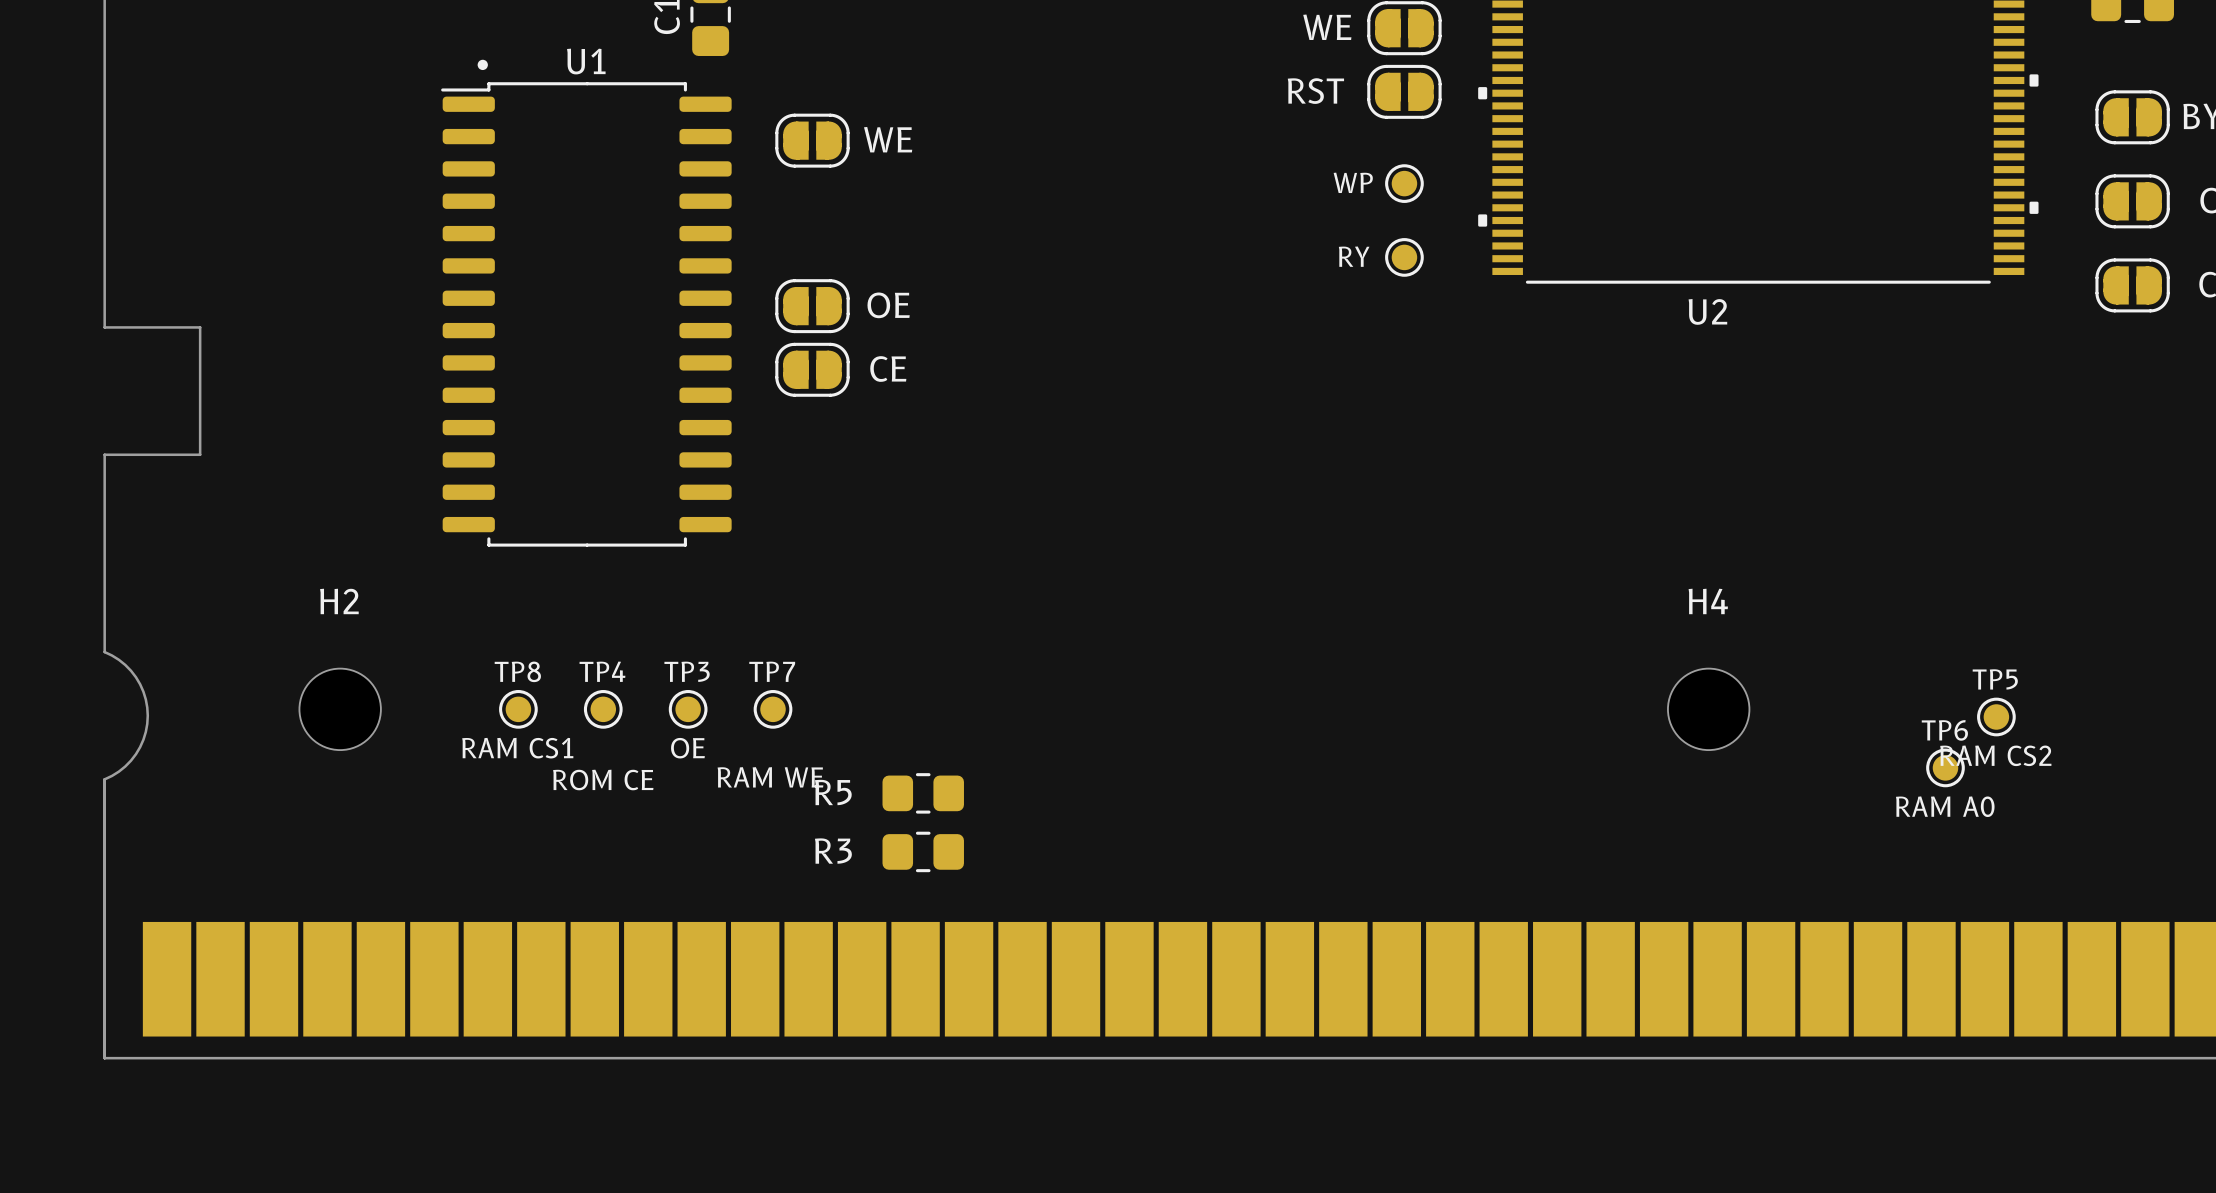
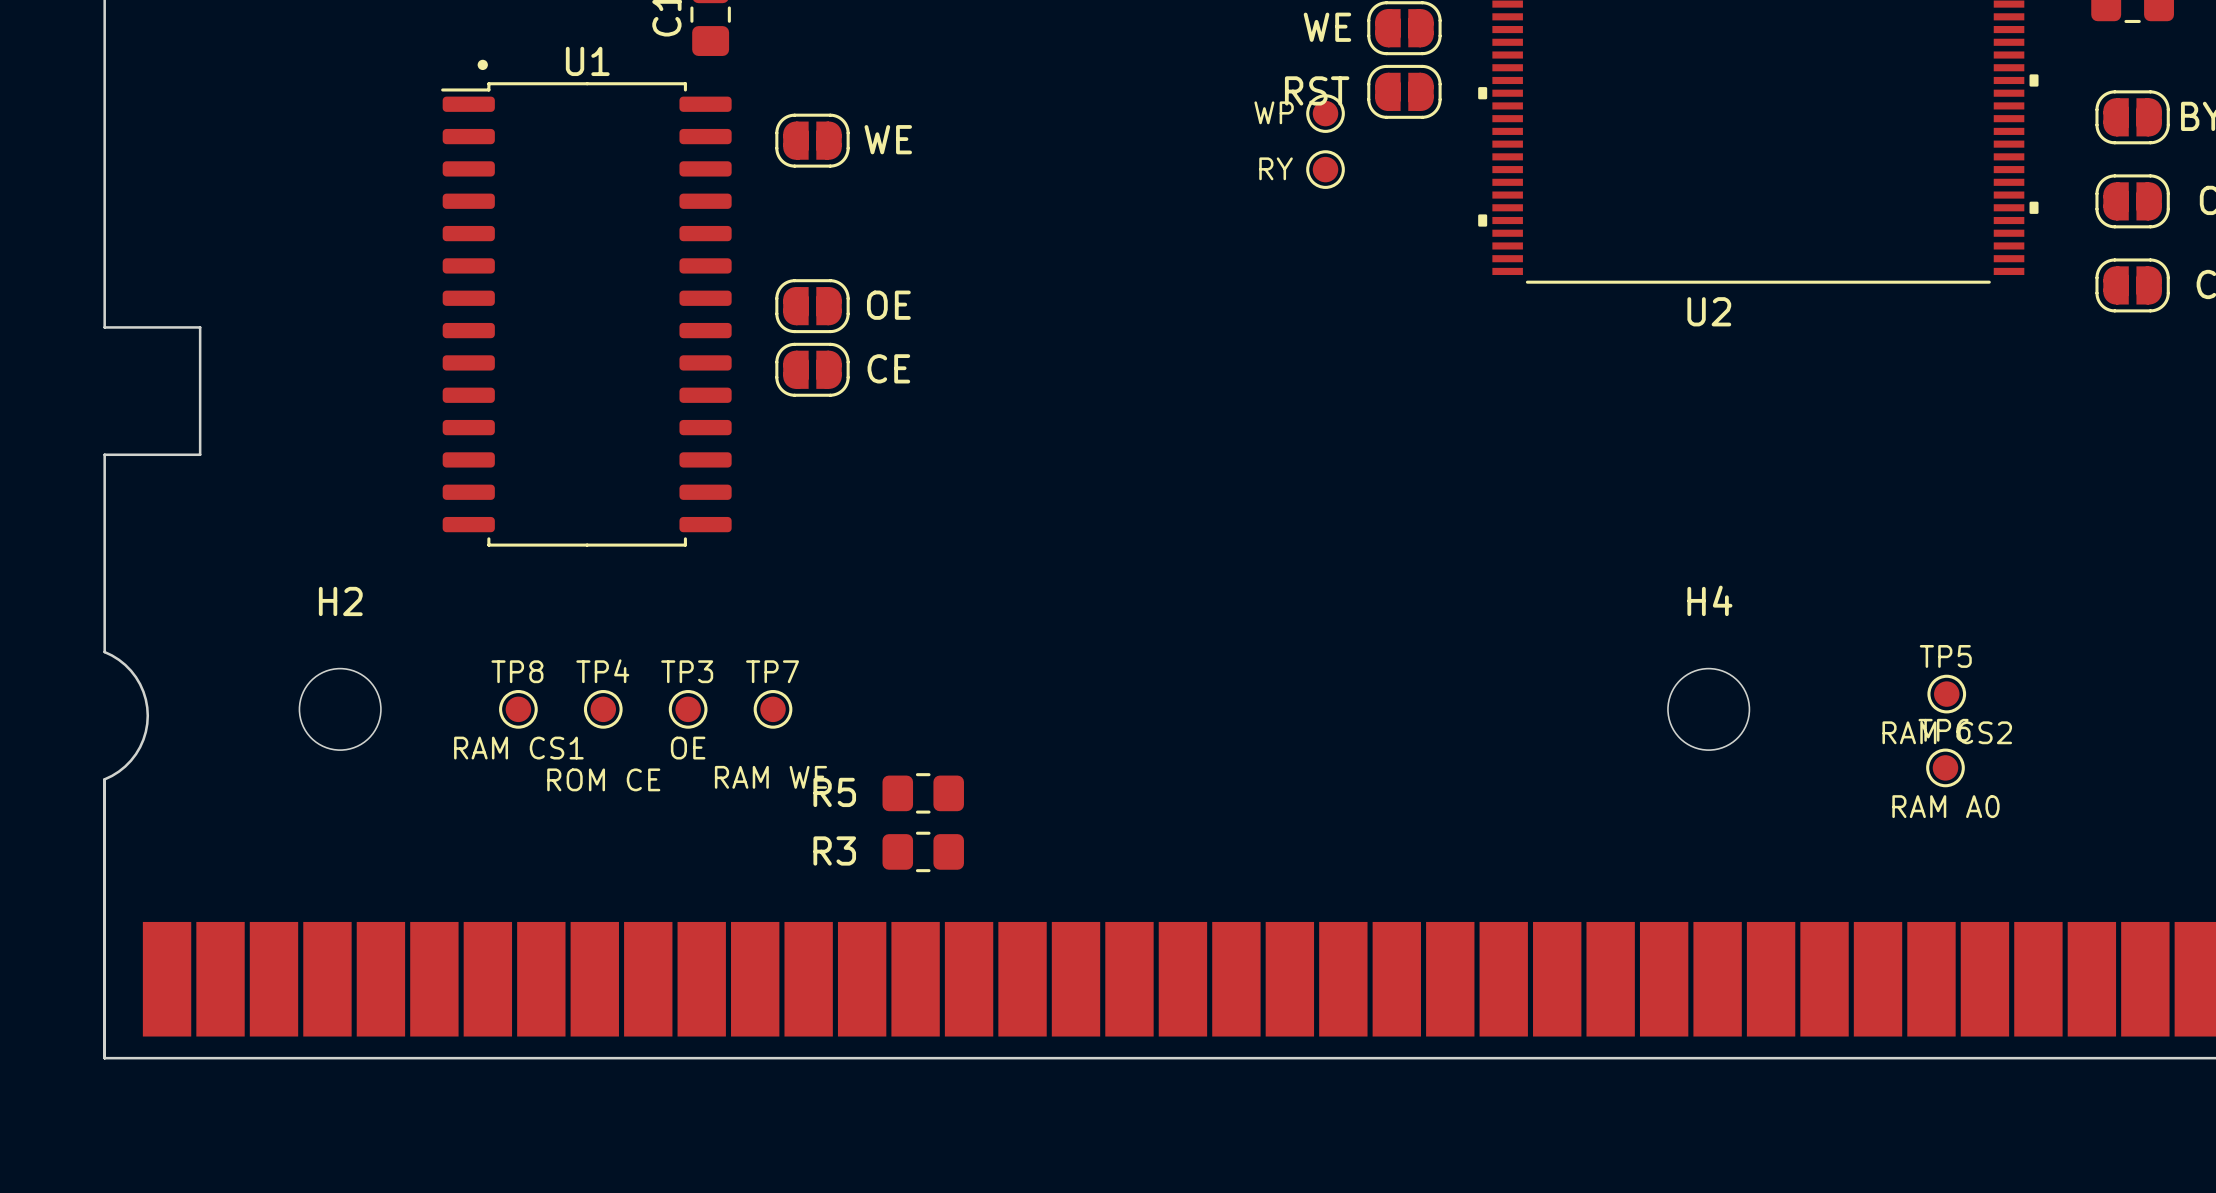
part position: (1404, 183) -> (1325, 113)
part position: (1404, 257) -> (1325, 169)
TP5 position: (1996, 716) -> (1946, 694)

